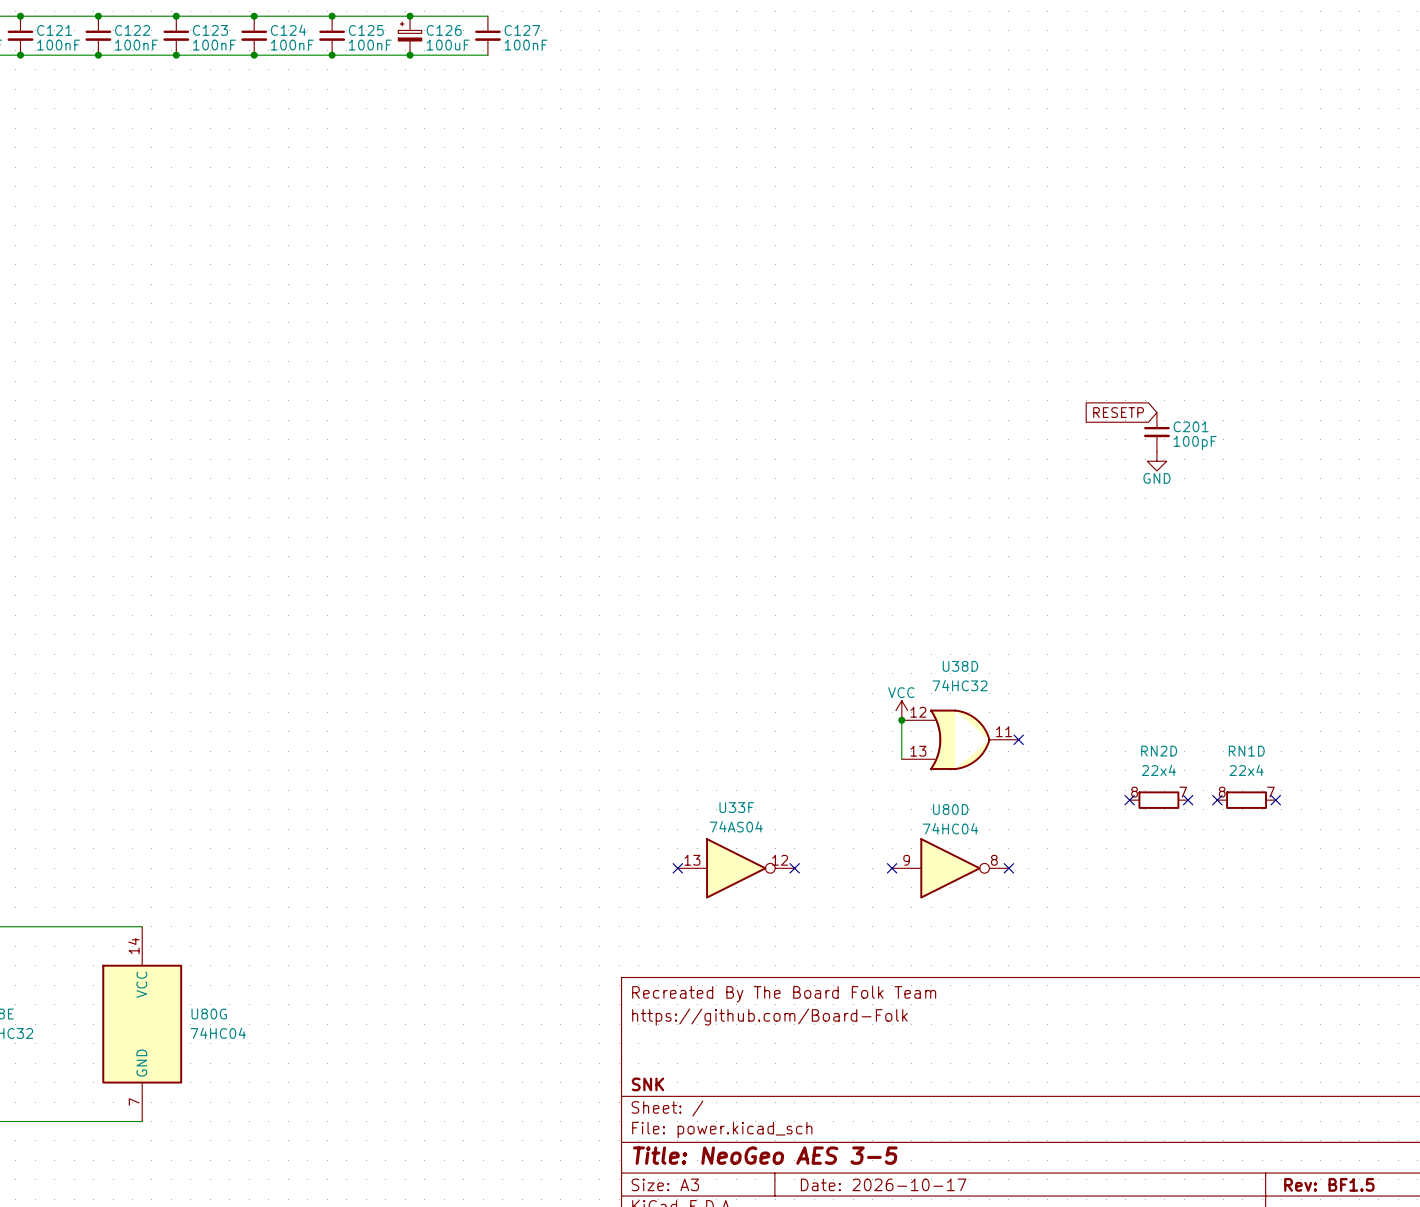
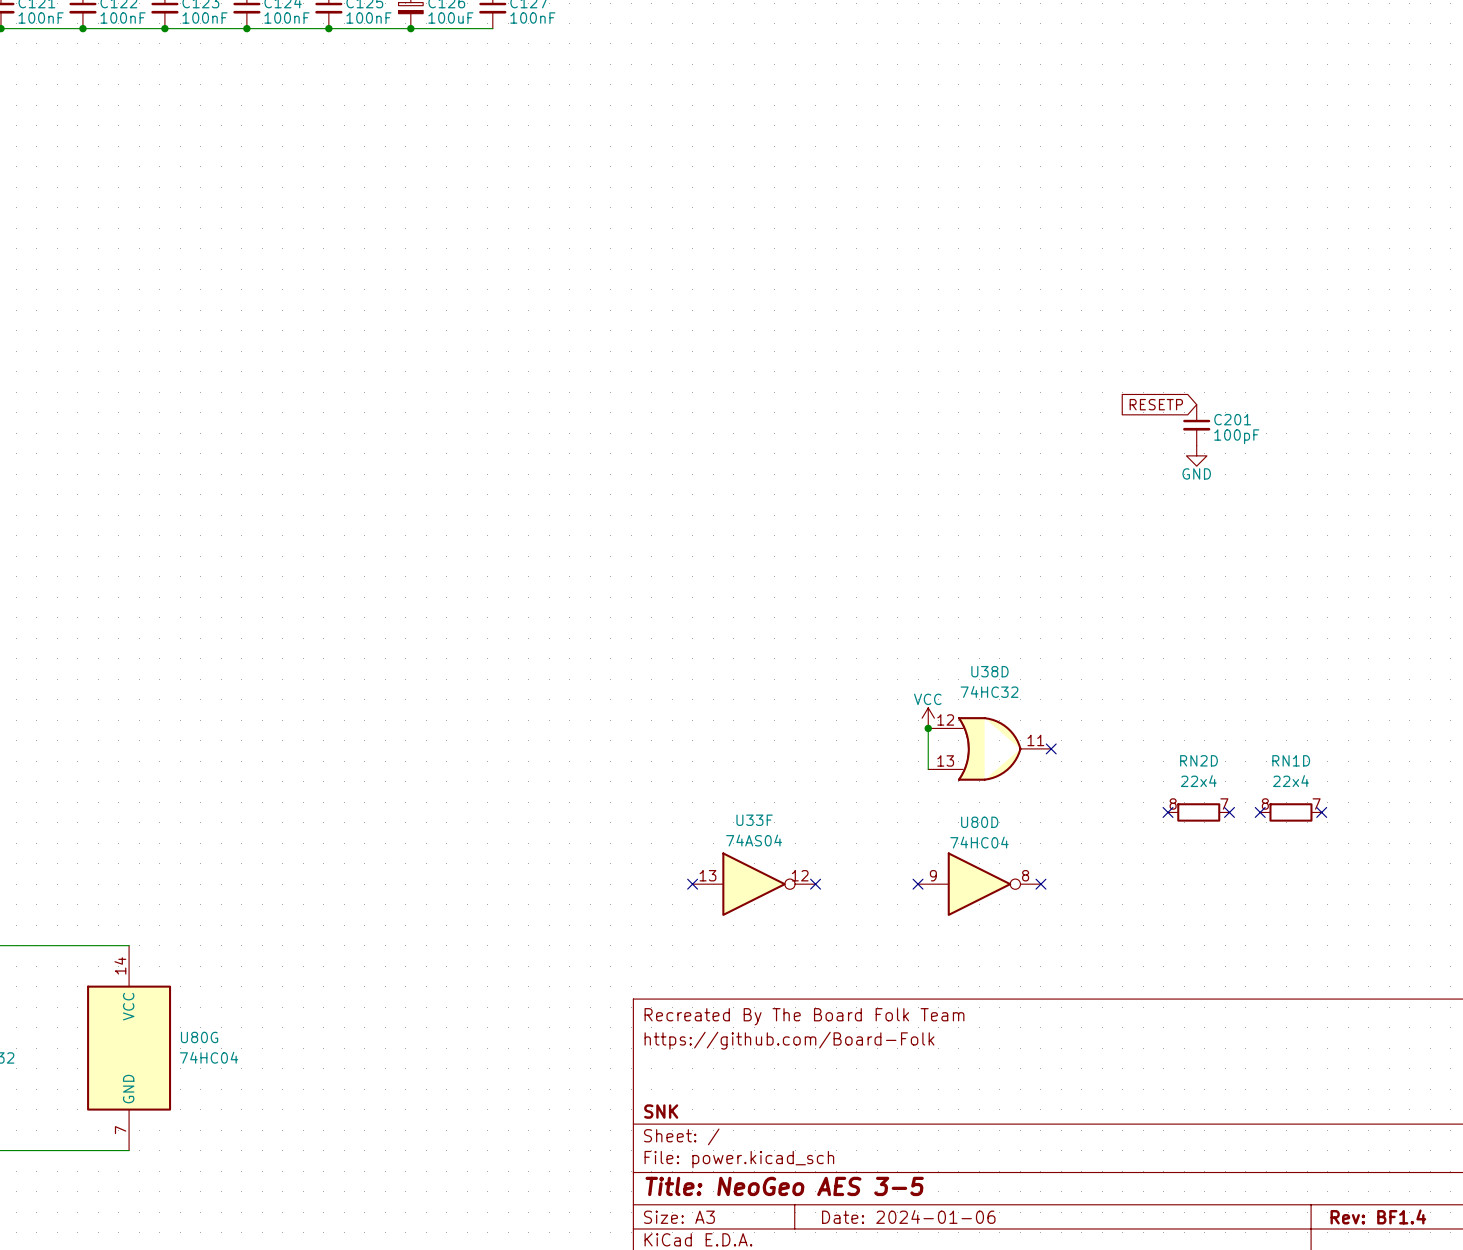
title block: Date: 2026-10-17 (883, 1184) -> Date: 2024-01-06 (908, 1216)
title block: Rev: BF1.5 (1329, 1184) -> Rev: BF1.4 (1378, 1216)

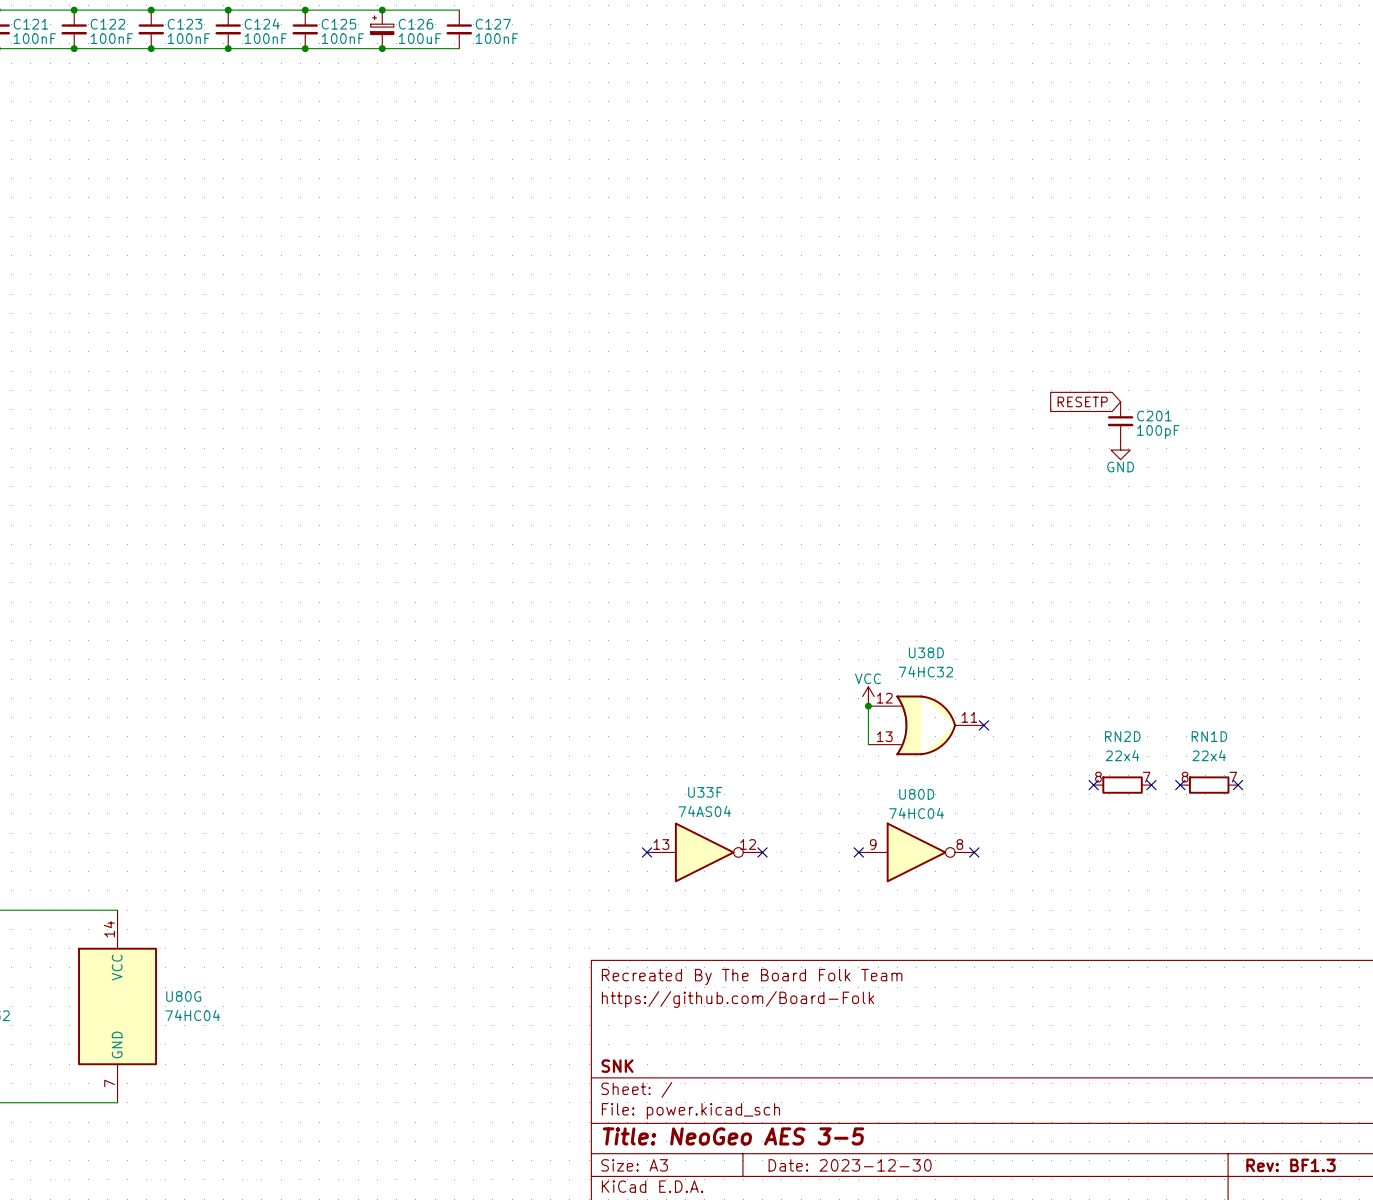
title block: Date: 2024-01-06 (908, 1216) -> Date: 2023-12-30 (850, 1165)
title block: Rev: BF1.4 (1378, 1216) -> Rev: BF1.3 (1291, 1165)

